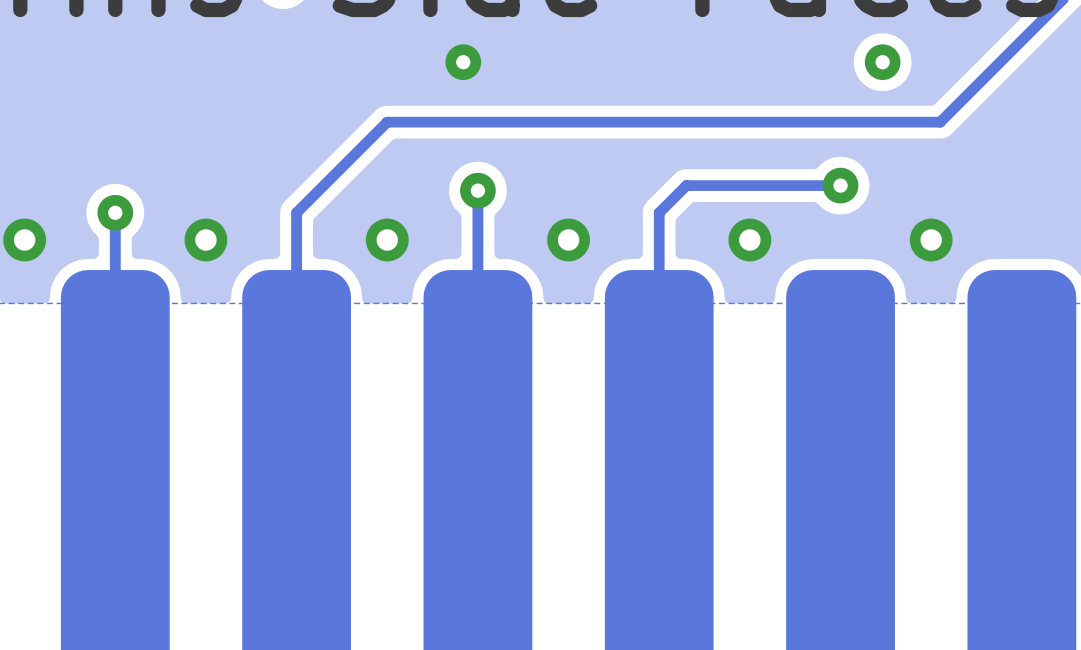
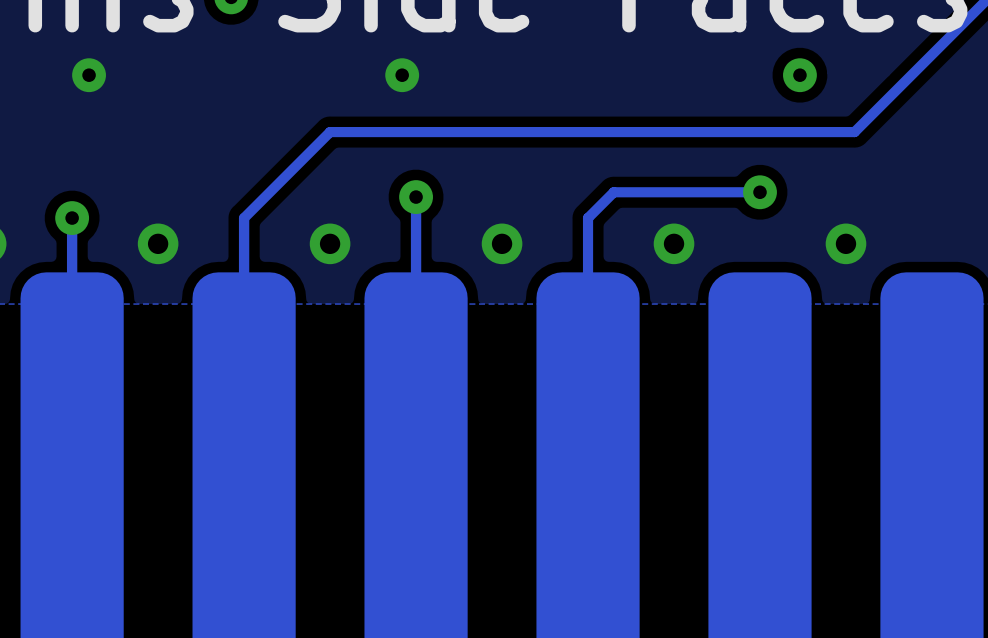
via: none -> (89, 75)

